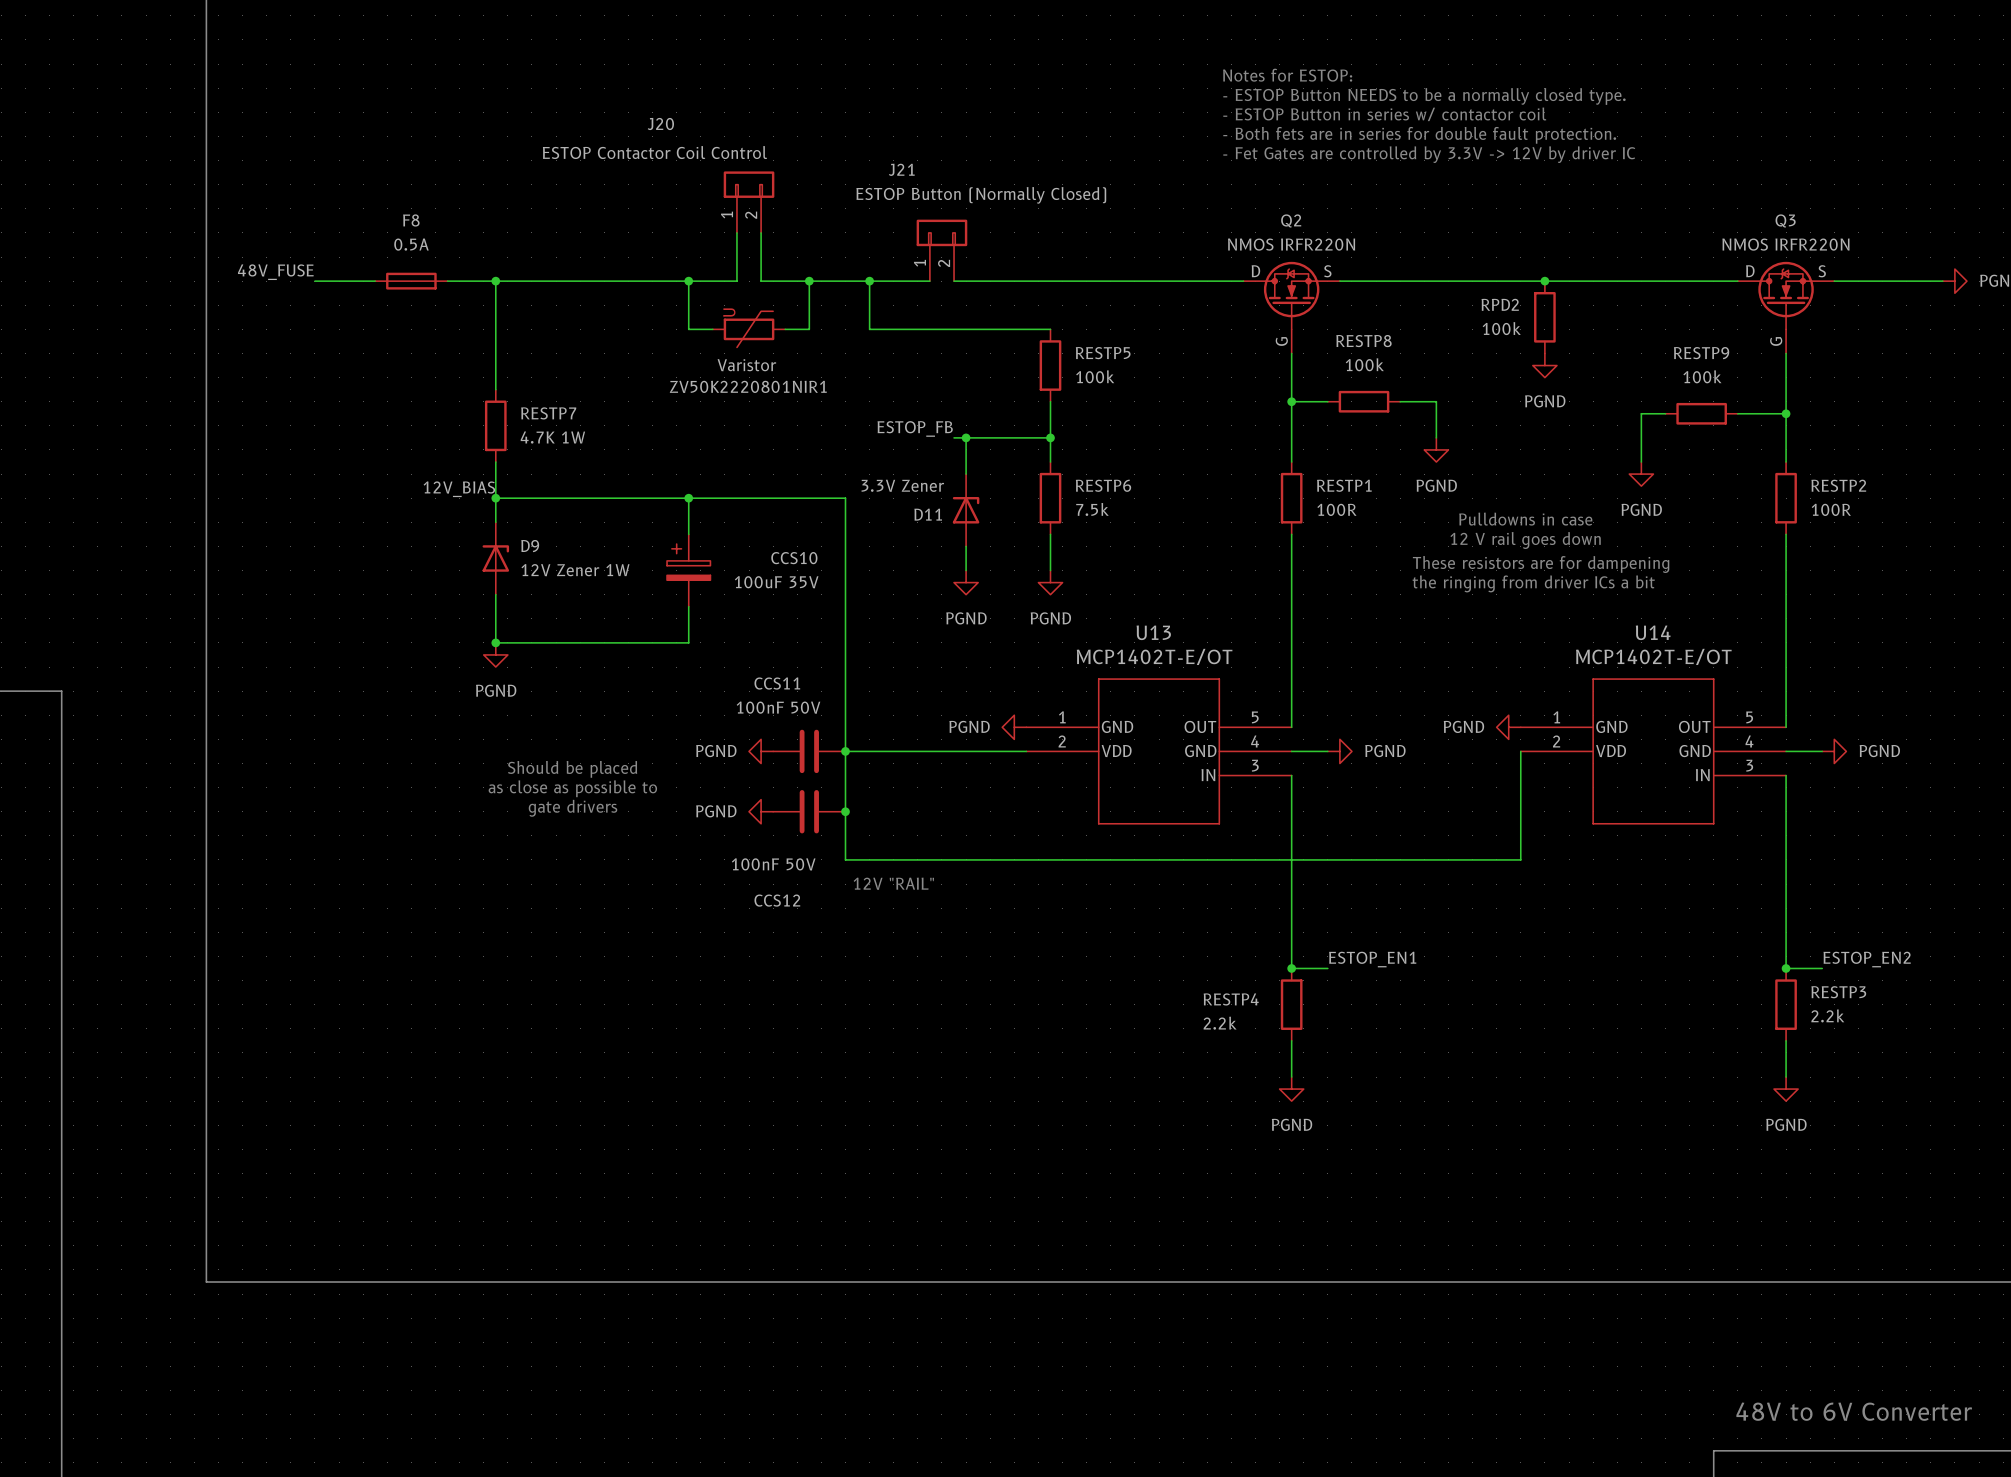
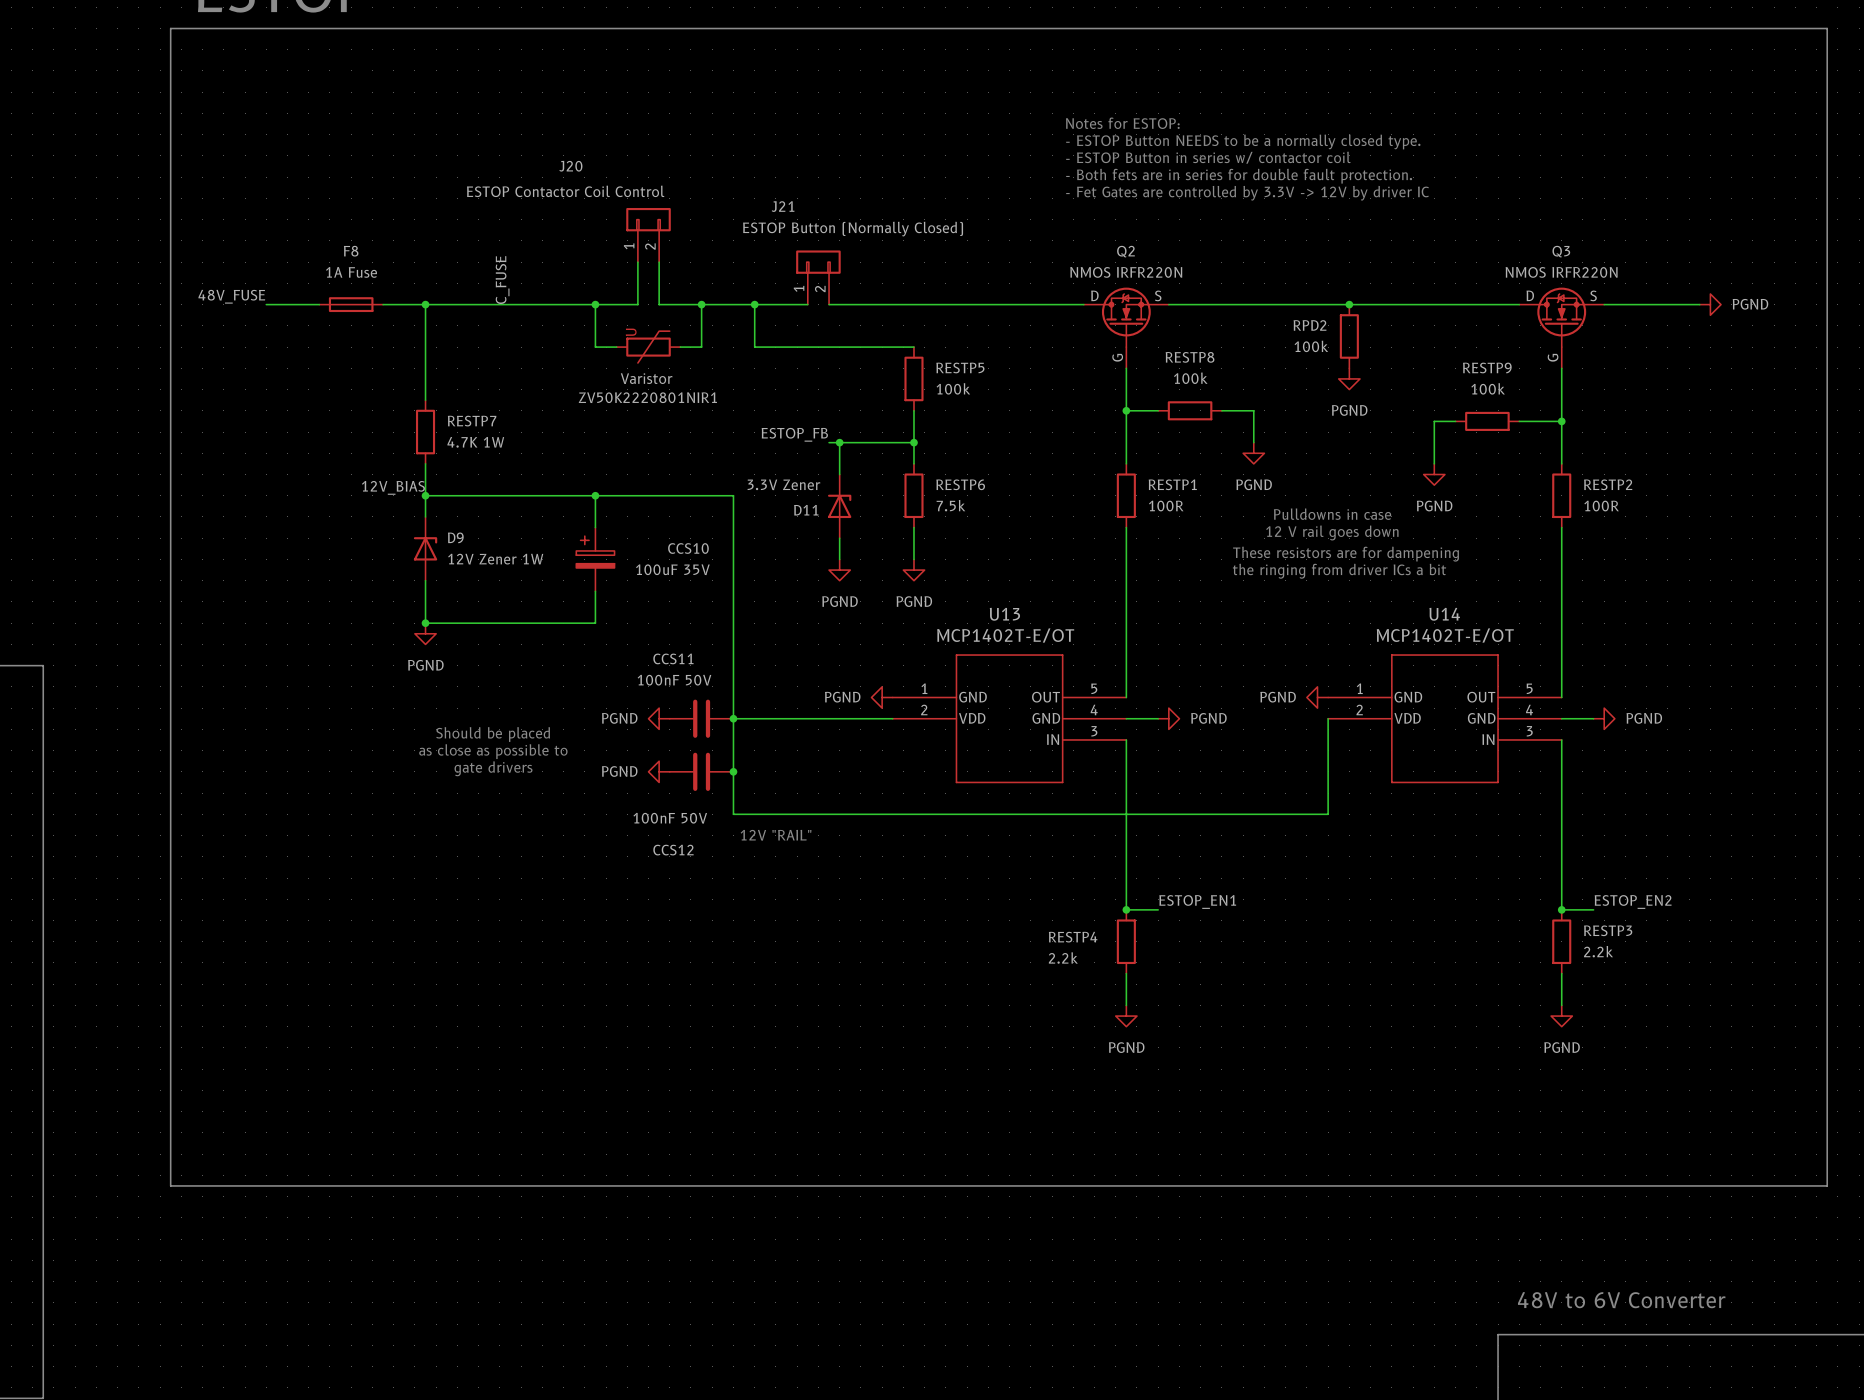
F8 value: 0.5A (411, 244) -> 1A Fuse (351, 272)
label: none -> C_FUSE (502, 280)

